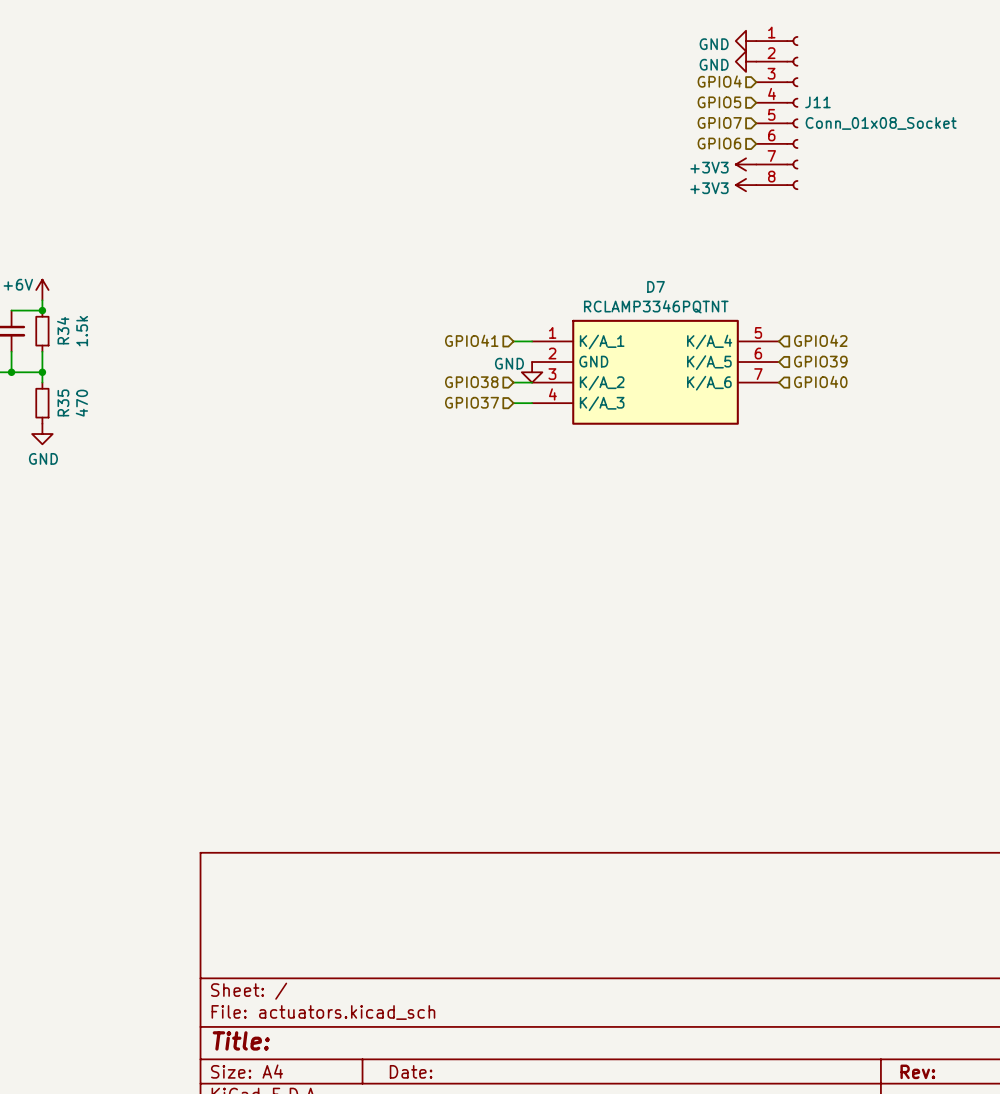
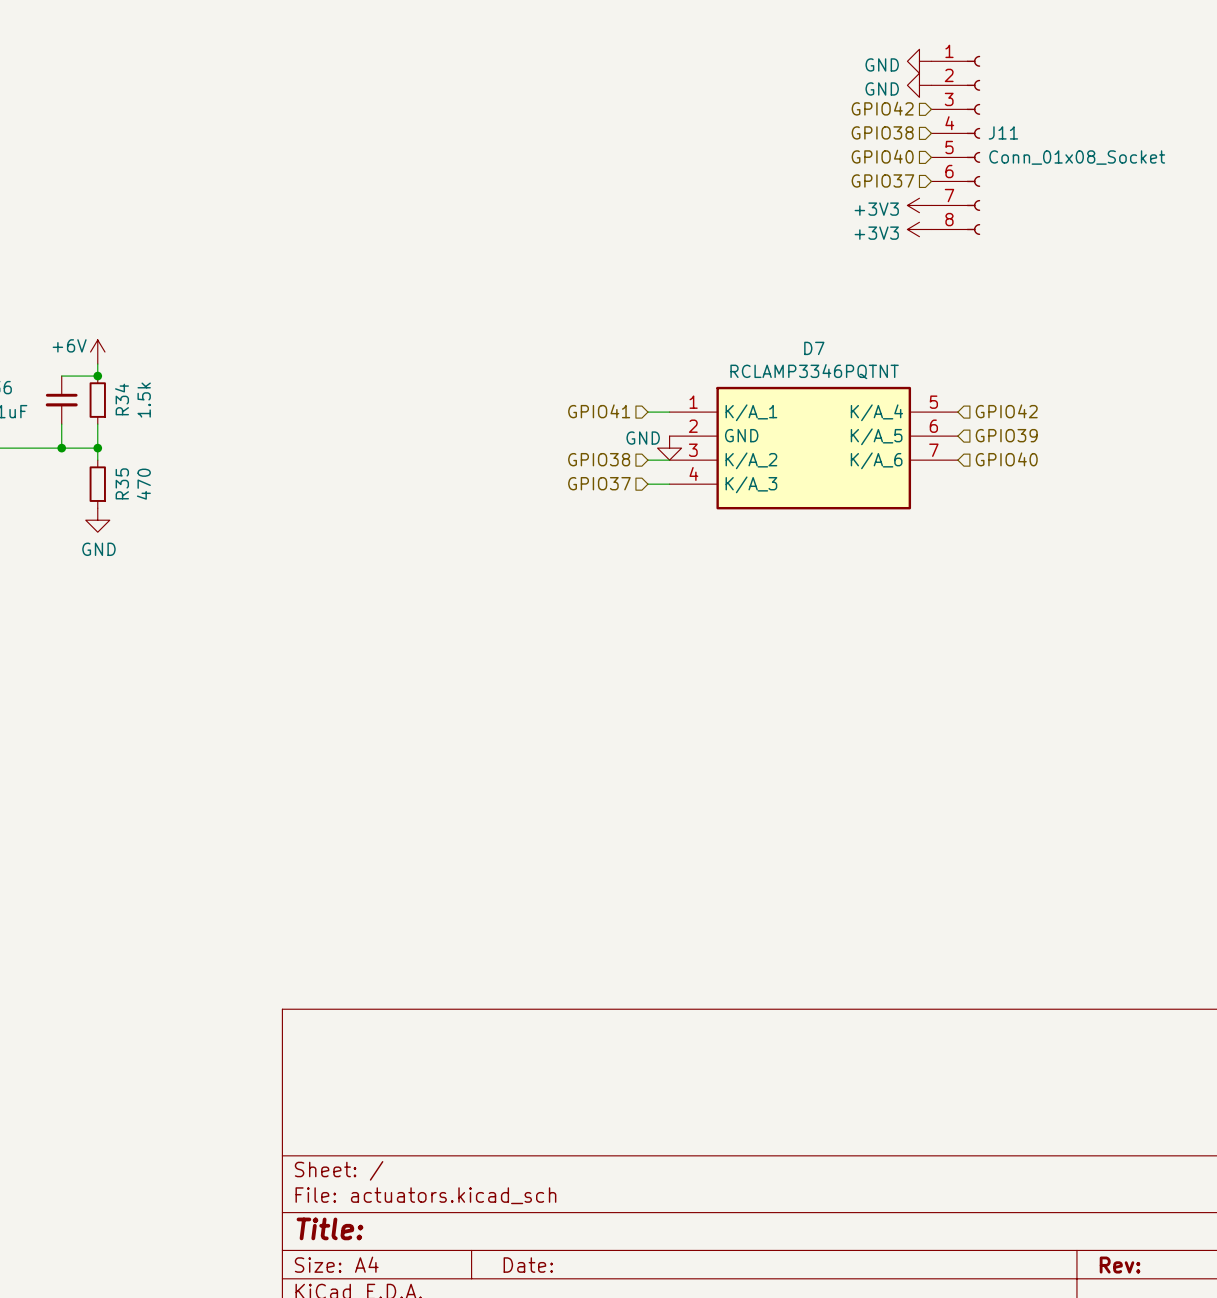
hierarchical label: GPIO4 (719, 81) -> GPIO42 (882, 108)
hierarchical label: GPIO5 (719, 102) -> GPIO38 (882, 132)
hierarchical label: GPIO7 (719, 122) -> GPIO40 (882, 156)
hierarchical label: GPIO6 (719, 143) -> GPIO37 (882, 180)

